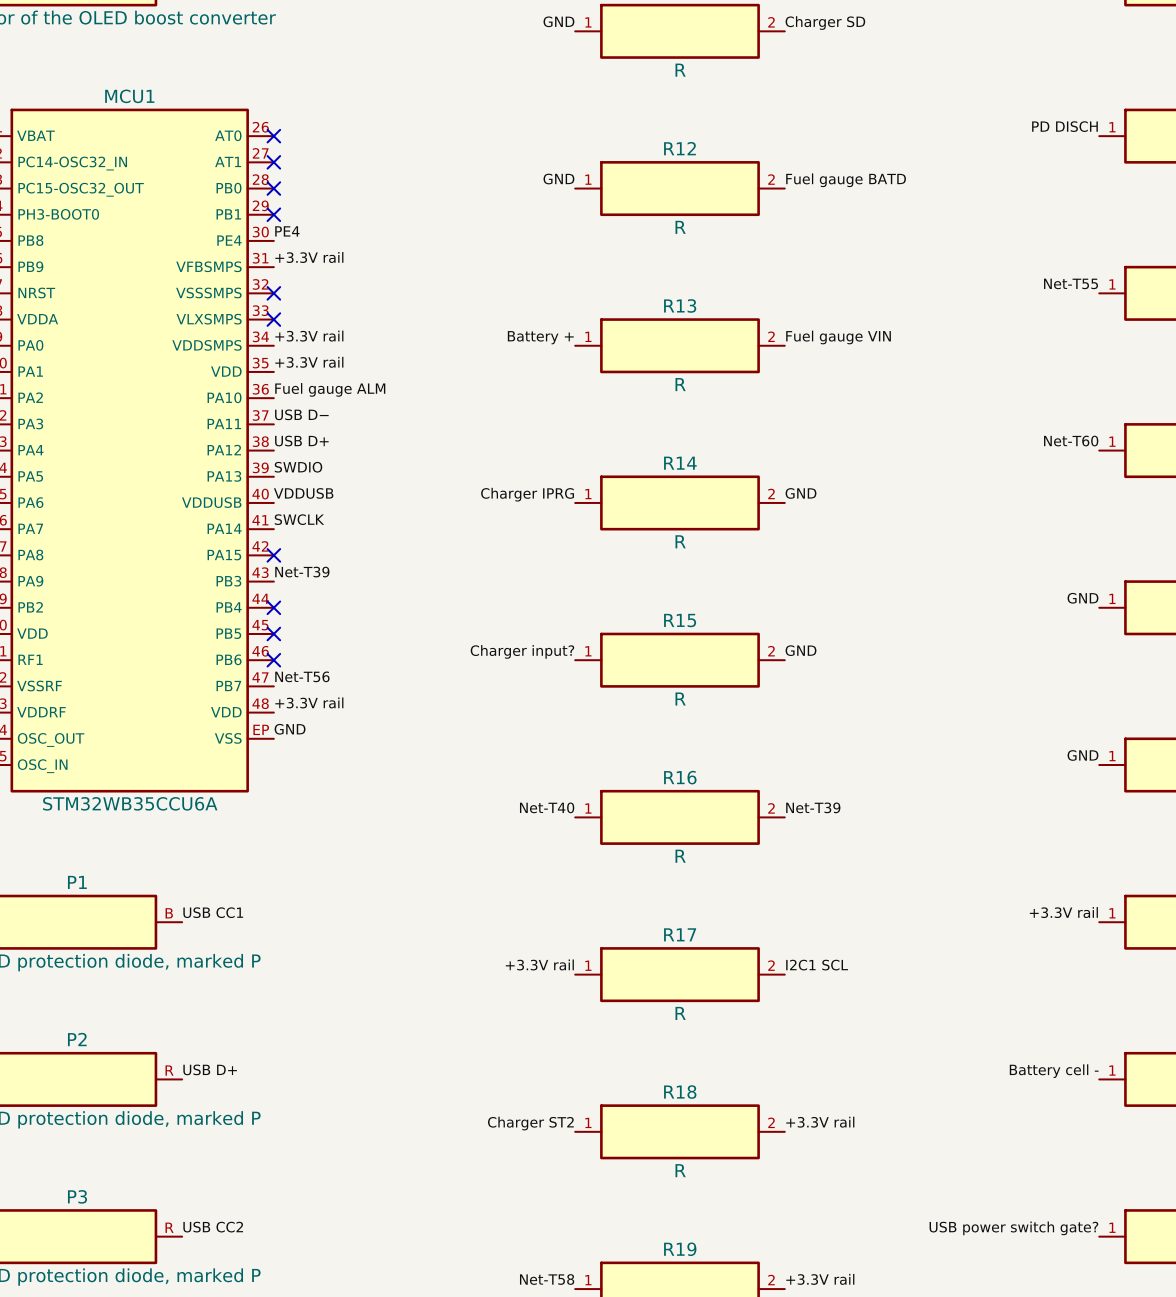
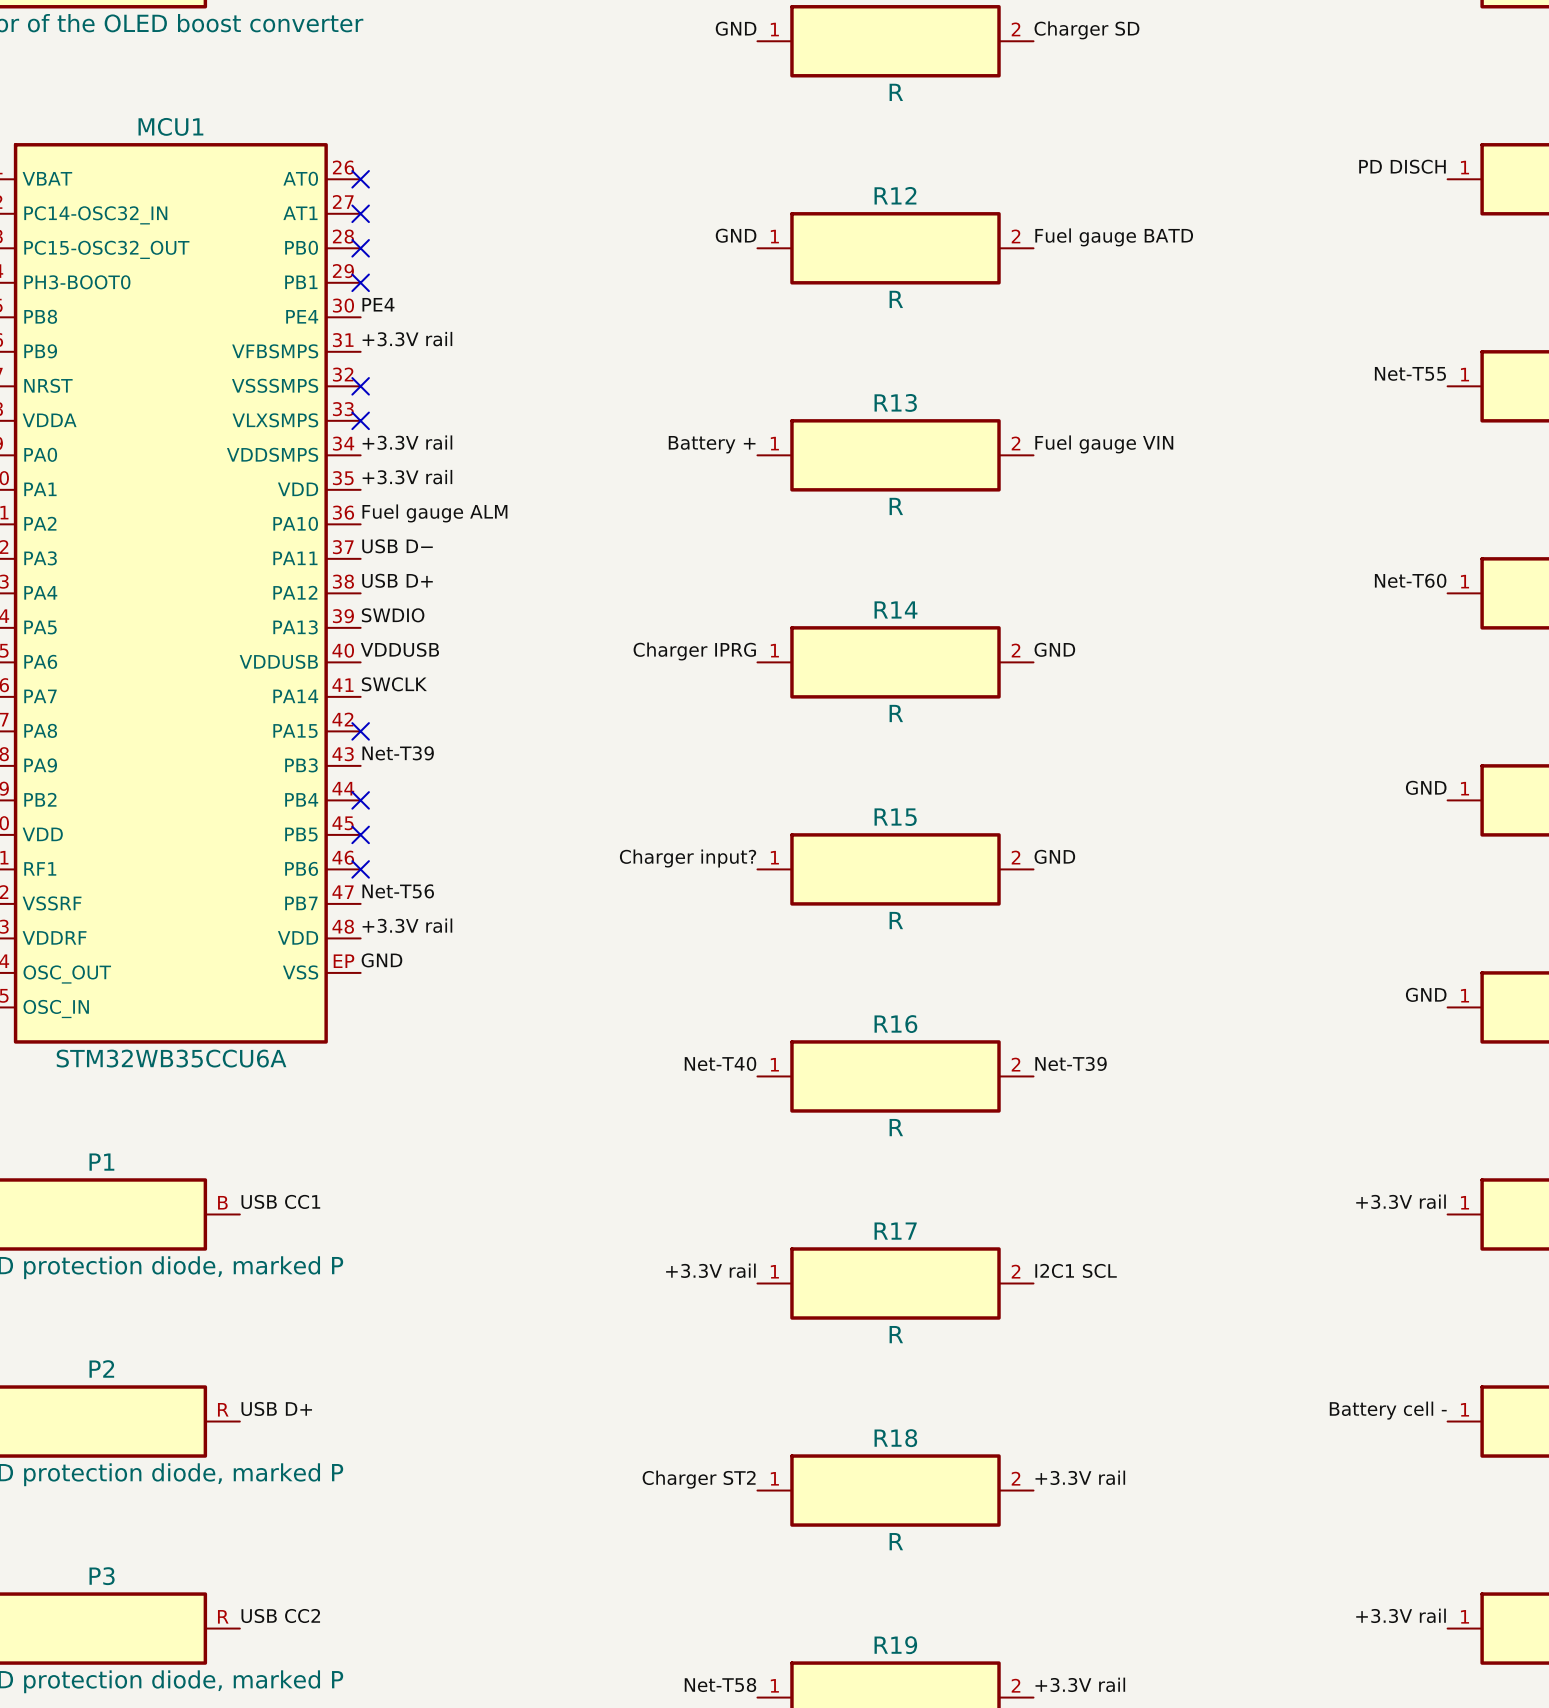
label: USB power switch gate? (1013, 1228) -> +3.3V rail (1401, 1615)

